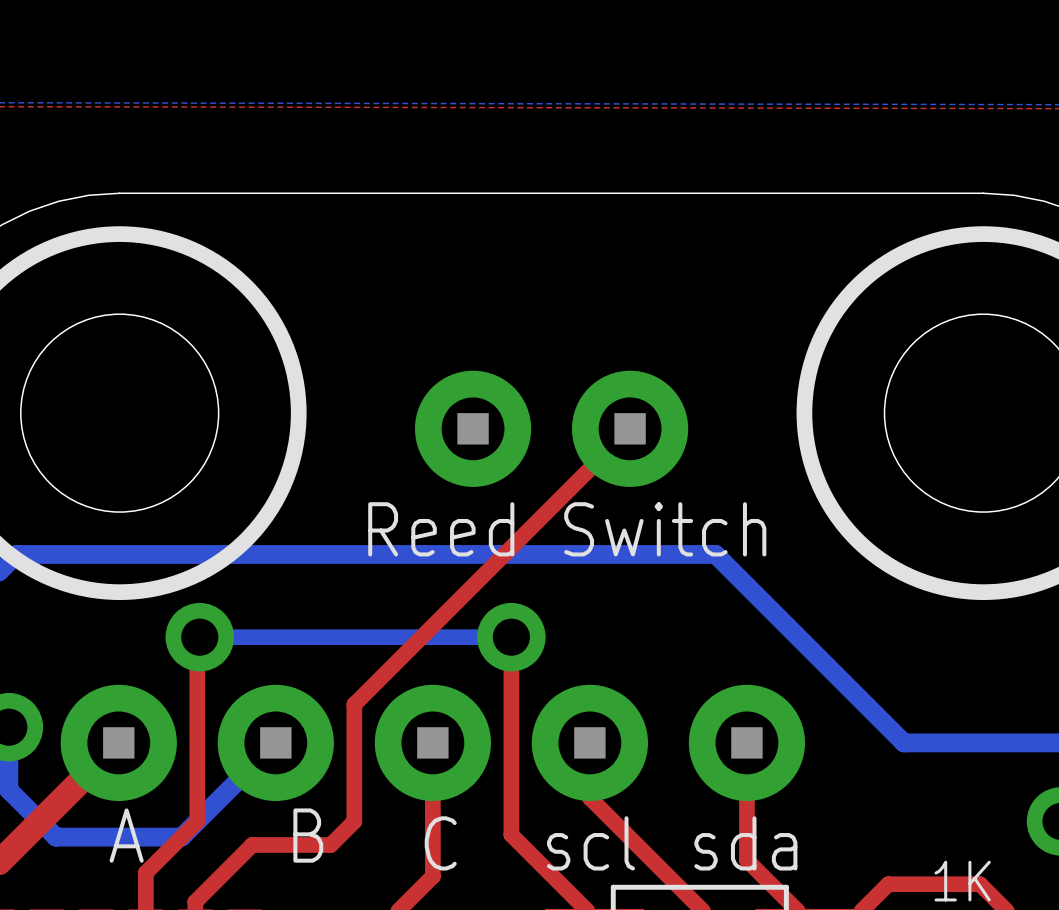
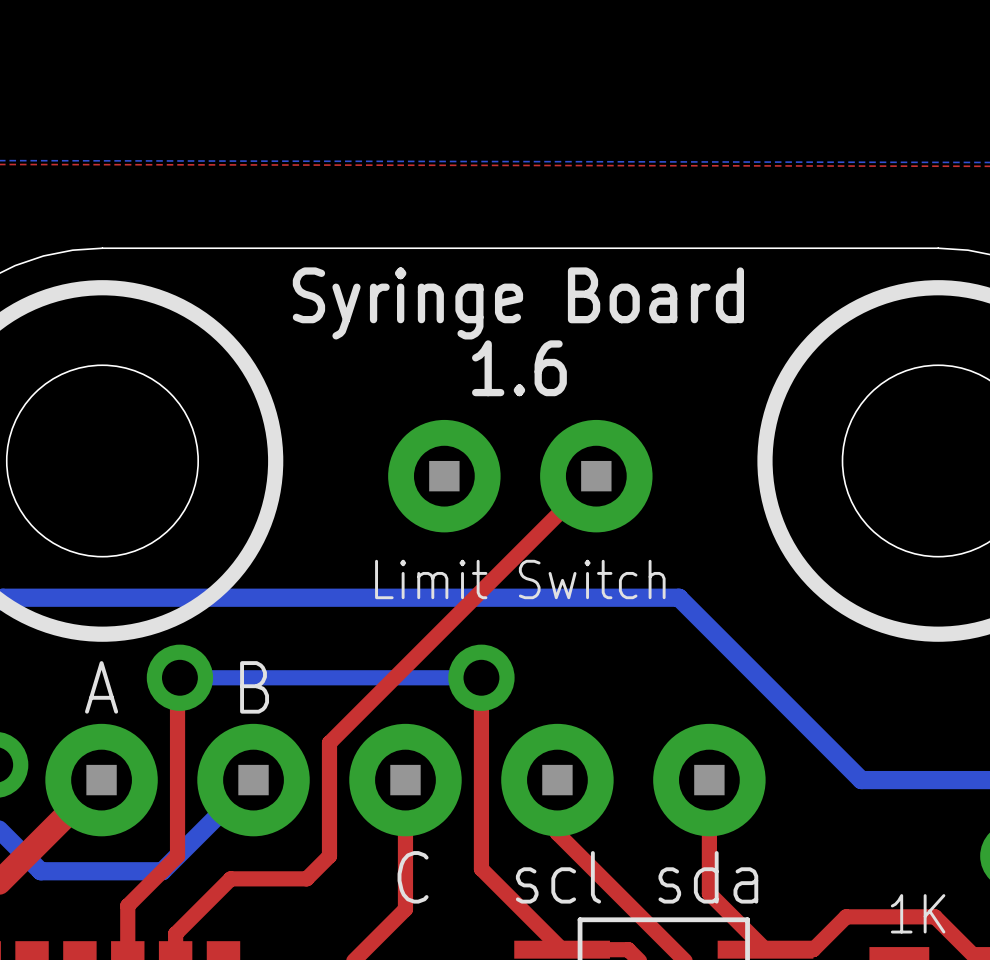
text: none -> Syringe Board (518, 303)
text: none -> 1.6 (519, 368)
text: Reed Switch (567, 529) -> Limit Switch (520, 579)
text position: A (126, 835) -> A (101, 687)
text position: B (308, 835) -> B (254, 687)

